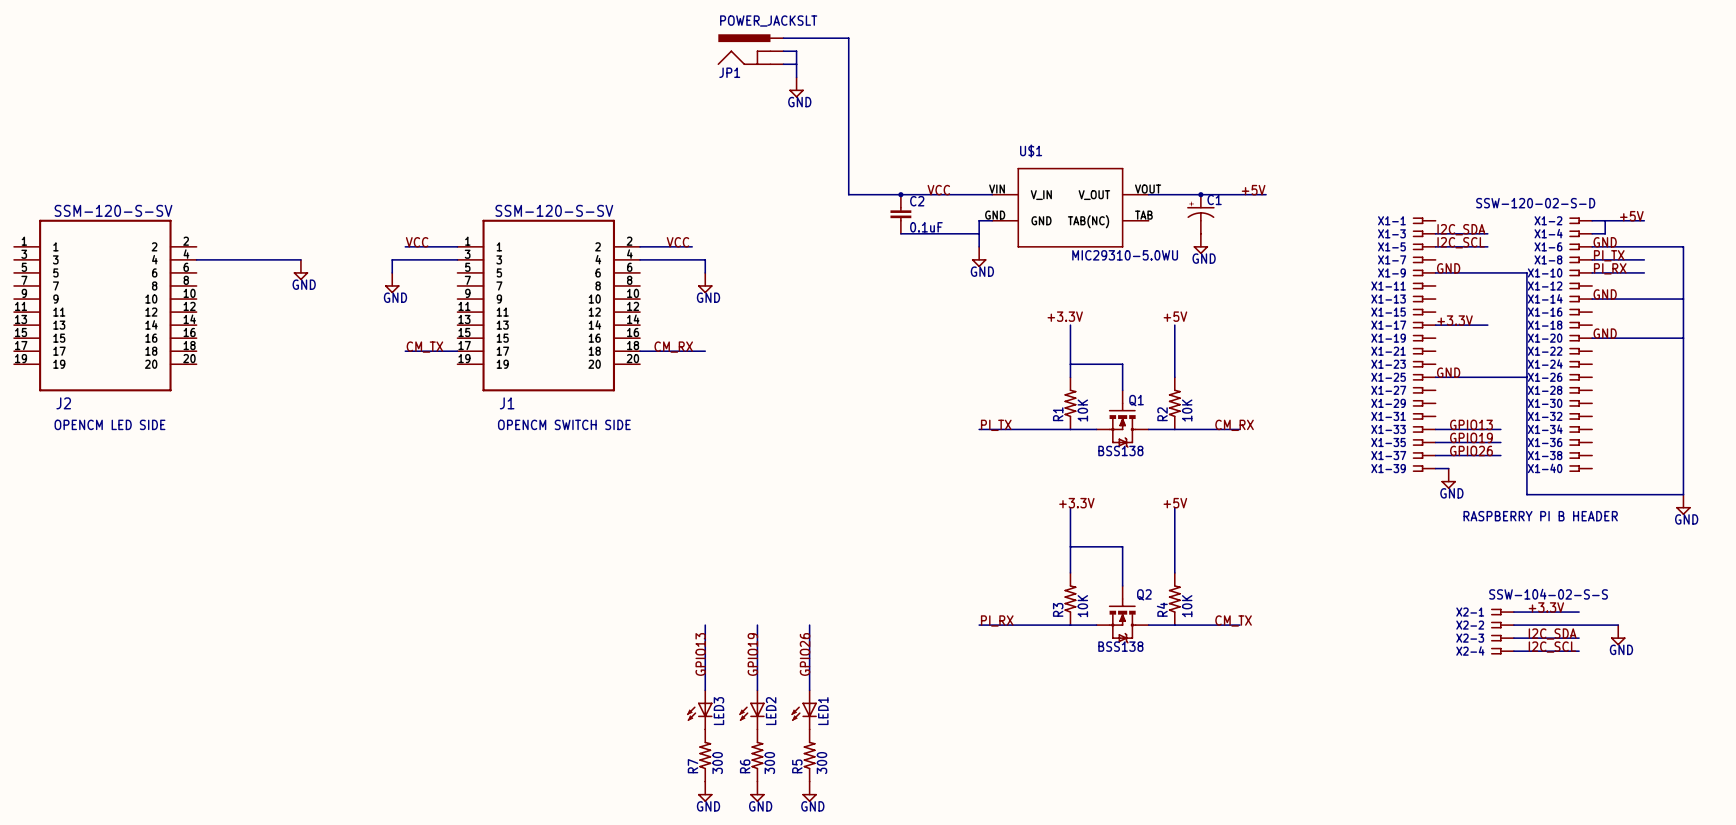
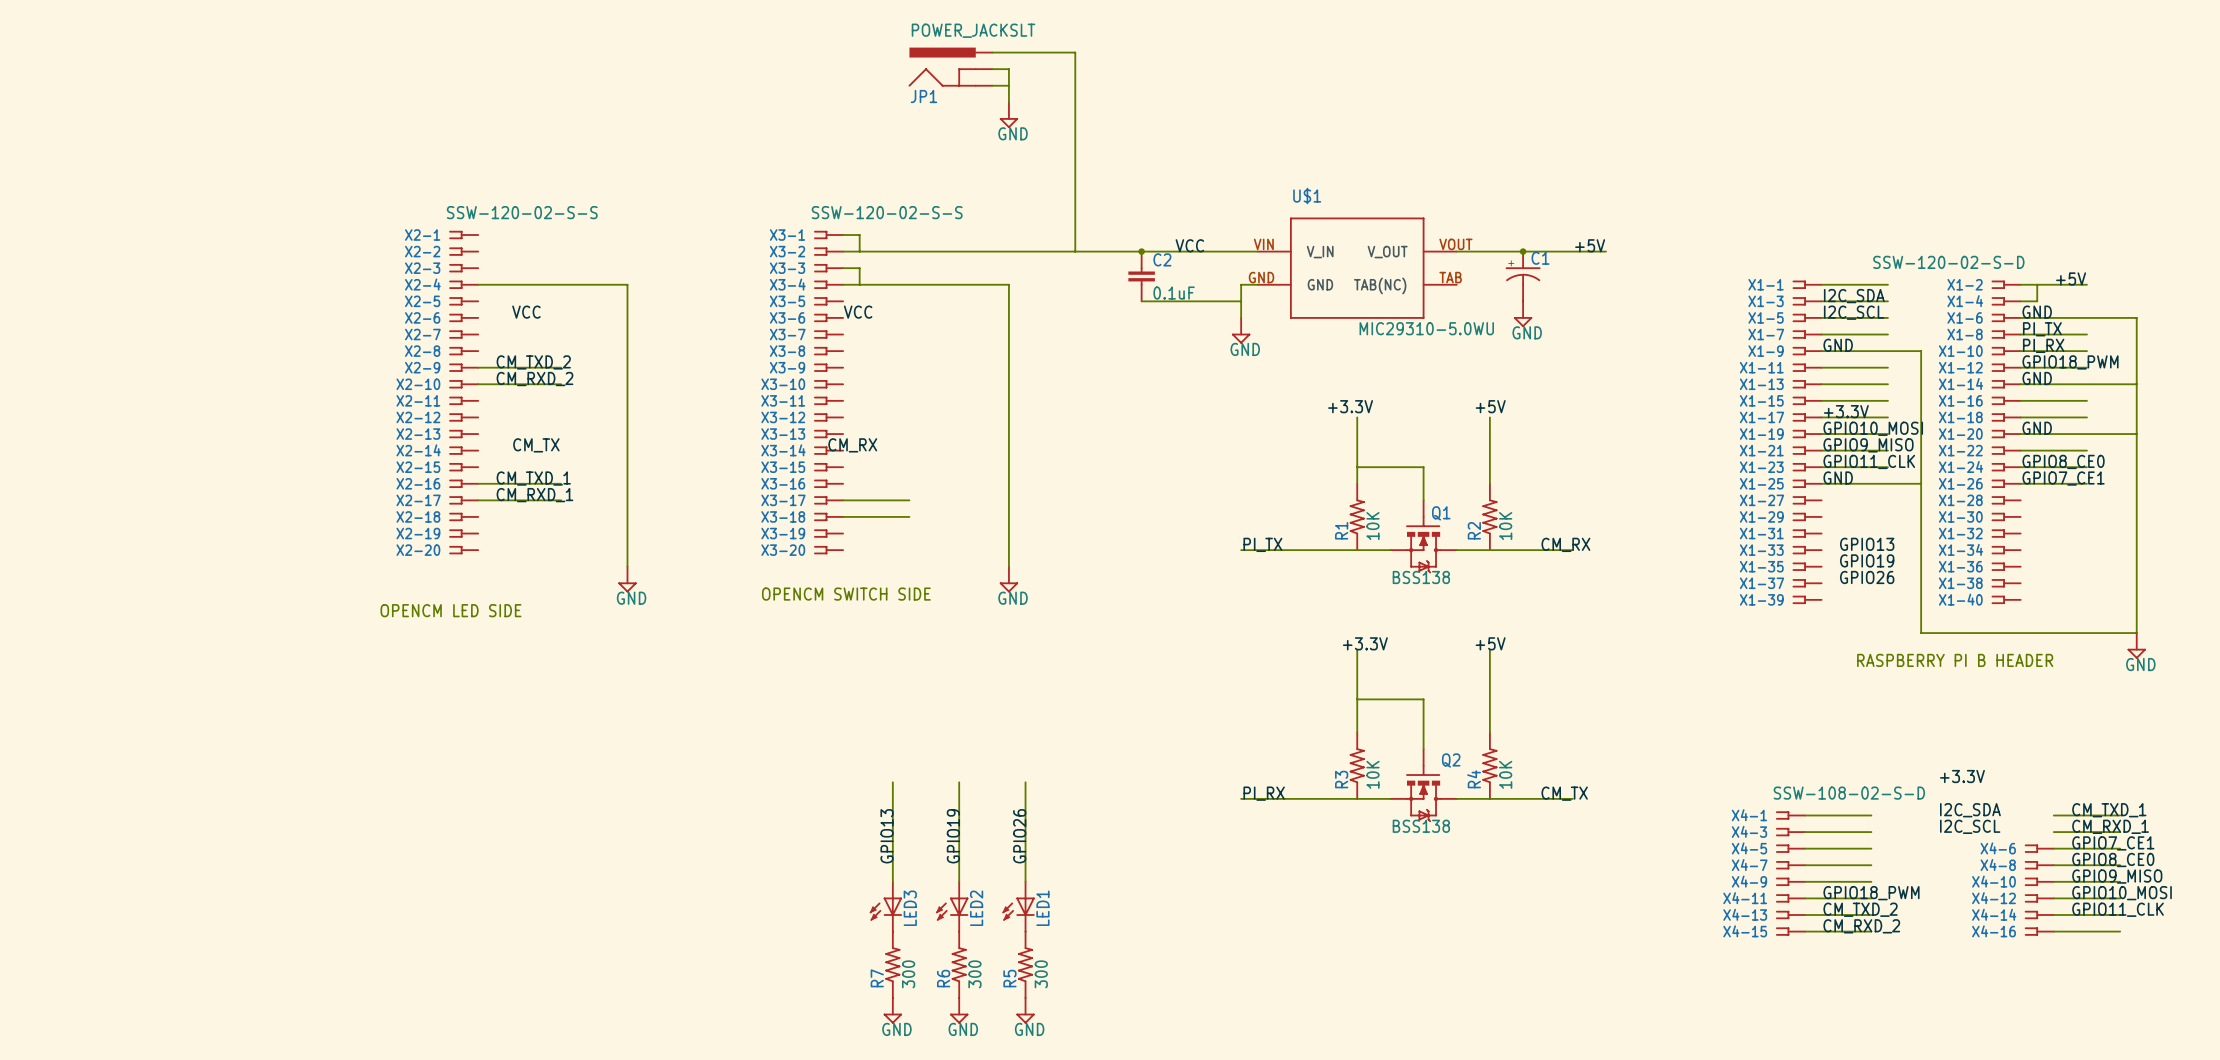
X3-1: none -> SSW-120-02-S-S (828, 235)
wire: none -> (843, 235) (859, 235) (859, 251)
X3-2: none -> (828, 251)
wire: none -> (843, 251) (1075, 251)
X3-3: none -> (828, 268)
wire: none -> (843, 268) (859, 268) (859, 284)
wire: none -> (478, 284) (627, 284) (627, 566)
X3-4: none -> (828, 284)
wire: none -> (843, 284) (1008, 284) (1008, 566)
wire: none -> (1821, 284) (1887, 284)
X2-5: none -> (463, 301)
X3-5: none -> (828, 301)
X2-6: none -> (463, 317)
wire: (405, 246) (457, 246) -> none
wire: (640, 246) (692, 246) -> none
X3-6: none -> (828, 317)
wire: (196, 259) (300, 259) -> none
X2-7: none -> (463, 334)
wire: (457, 259) (392, 259) (392, 272) -> none
wire: (640, 259) (705, 259) (705, 272) -> none
X3-7: none -> (828, 334)
wire: none -> (1821, 334) (1887, 334)
power symbol: GND (300, 270) -> none
X2-8: none -> (463, 351)
X3-8: none -> (828, 351)
wire: (1513, 272) (1526, 272) (1526, 494) -> (1921, 351) (1921, 633) (1937, 633)
label: none -> CM_TXD_2 (533, 362)
label: none -> GPIO18_PWM (2070, 362)
power symbol: GND (392, 283) -> none
power symbol: GND (705, 283) -> none
X2-9: none -> (463, 367)
wire: none -> (478, 367) (561, 367)
X3-9: none -> (828, 367)
wire: none -> (1821, 367) (1887, 367)
wire: none -> (2020, 367) (2086, 367)
label: none -> CM_RXD_2 (534, 379)
X2-10: none -> (463, 384)
wire: none -> (478, 384) (561, 384)
X3-10: none -> (828, 384)
wire: none -> (1821, 384) (1887, 384)
J2: SSM-120-S-SV (105, 305) -> none
J1: SSM-120-S-SV (548, 305) -> none
X2-11: none -> (463, 400)
X3-11: none -> (828, 400)
wire: none -> (1821, 400) (1887, 400)
wire: none -> (2020, 400) (2086, 400)
X2-12: none -> (463, 417)
X3-12: none -> (828, 417)
wire: none -> (2020, 417) (2086, 417)
label: none -> GPIO10_MOSI (1873, 428)
X2-13: none -> (463, 434)
X3-13: none -> (828, 434)
wire: none -> (1821, 434) (1887, 434)
label: none -> GPIO9_MISO (1868, 445)
X2-14: none -> (463, 450)
wire: (405, 351) (457, 351) -> none
wire: (640, 351) (705, 351) -> none
X3-14: none -> (828, 450)
wire: none -> (1821, 450) (1887, 450)
wire: none -> (2020, 450) (2086, 450)
label: none -> GPIO11_CLK (1869, 461)
label: none -> GPIO8_CE0 (2063, 461)
X2-15: none -> (463, 467)
X3-15: none -> (828, 467)
wire: none -> (1821, 467) (1887, 467)
wire: none -> (2020, 467) (2086, 467)
label: none -> CM_TXD_1 (533, 478)
label: none -> GPIO7_CE1 (2063, 478)
X2-16: none -> (463, 483)
wire: none -> (478, 483) (561, 483)
X3-16: none -> (828, 483)
wire: (1513, 377) (1526, 377) -> none
wire: none -> (2020, 483) (2086, 483)
label: none -> CM_RXD_1 (534, 495)
X2-17: none -> (463, 500)
wire: none -> (478, 500) (561, 500)
X3-17: none -> (828, 500)
wire: none -> (843, 500) (909, 500)
X2-18: none -> (463, 516)
X3-18: none -> (828, 516)
wire: none -> (843, 516) (909, 516)
X2-19: none -> (463, 533)
X3-19: none -> (828, 533)
text: OPENCM LED SIDE (109, 424) -> none
text position: OPENCM SWITCH SIDE (564, 424) -> OPENCM SWITCH SIDE (846, 594)
X2-20: none -> (463, 550)
X3-20: none -> (828, 550)
wire: (1435, 429) (1500, 429) -> none
wire: (1435, 442) (1500, 442) -> none
power symbol: none -> GND (627, 579)
power symbol: none -> GND (1008, 579)
wire: (1435, 455) (1500, 455) -> none
wire: (1435, 468) (1448, 468) -> none
text: none -> OPENCM LED SIDE (450, 610)
power symbol: GND (1448, 478) -> none
X2-1 value: SSW-104-02-S-S (1548, 594) -> SSW-120-02-S-S (522, 212)
wire: none -> (892, 782) (892, 798)
wire: none -> (959, 782) (959, 798)
wire: none -> (1025, 782) (1025, 798)
X2-1 position: (1502, 612) -> (463, 235)
wire: (1513, 612) (1579, 612) -> none
X2-2 position: (1502, 625) -> (463, 251)
wire: (1513, 625) (1618, 625) -> none
label: none -> CM_TXD_1 (2109, 810)
power symbol: GND (1618, 635) -> none
X4-1: none -> SSW-108-02-S-D (1790, 815)
wire: none -> (1805, 815) (1871, 815)
X2-3 position: (1502, 638) -> (463, 268)
wire: (1513, 638) (1579, 638) -> none
wire: none -> (2053, 815) (2120, 815)
label: none -> CM_RXD_1 (2110, 826)
X4-3: none -> (1790, 832)
wire: none -> (1805, 832) (1871, 832)
X2-4 position: (1502, 651) -> (463, 284)
wire: (1513, 651) (1579, 651) -> none
wire: none -> (2053, 832) (2120, 832)
label: none -> GPIO7_CE1 (2113, 843)
X4-5: none -> (1790, 848)
wire: none -> (1805, 848) (1871, 848)
X4-6: none -> (2039, 848)
wire: none -> (2053, 848) (2120, 848)
label: none -> GPIO8_CE0 (2113, 859)
X4-7: none -> (1790, 865)
wire: none -> (1805, 865) (1871, 865)
X4-8: none -> (2039, 865)
wire: none -> (2053, 865) (2120, 865)
label: none -> GPIO9_MISO (2117, 876)
X4-9: none -> (1790, 881)
wire: none -> (1805, 881) (1871, 881)
X4-10: none -> (2039, 881)
wire: none -> (2053, 881) (2120, 881)
label: none -> GPIO18_PWM (1871, 893)
label: none -> GPIO10_MOSI (2122, 893)
X4-11: none -> (1790, 898)
wire: none -> (1805, 898) (1871, 898)
X4-12: none -> (2039, 898)
wire: none -> (2053, 898) (2120, 898)
label: none -> CM_TXD_2 (1860, 909)
label: none -> GPIO11_CLK (2118, 909)
X4-13: none -> (1790, 915)
wire: none -> (1805, 915) (1871, 915)
X4-14: none -> (2039, 915)
wire: none -> (2053, 915) (2120, 915)
label: none -> CM_RXD_2 (1861, 926)
X4-15: none -> (1790, 931)
wire: none -> (1805, 931) (1871, 931)
X4-16: none -> (2039, 931)
wire: none -> (2053, 931) (2120, 931)

